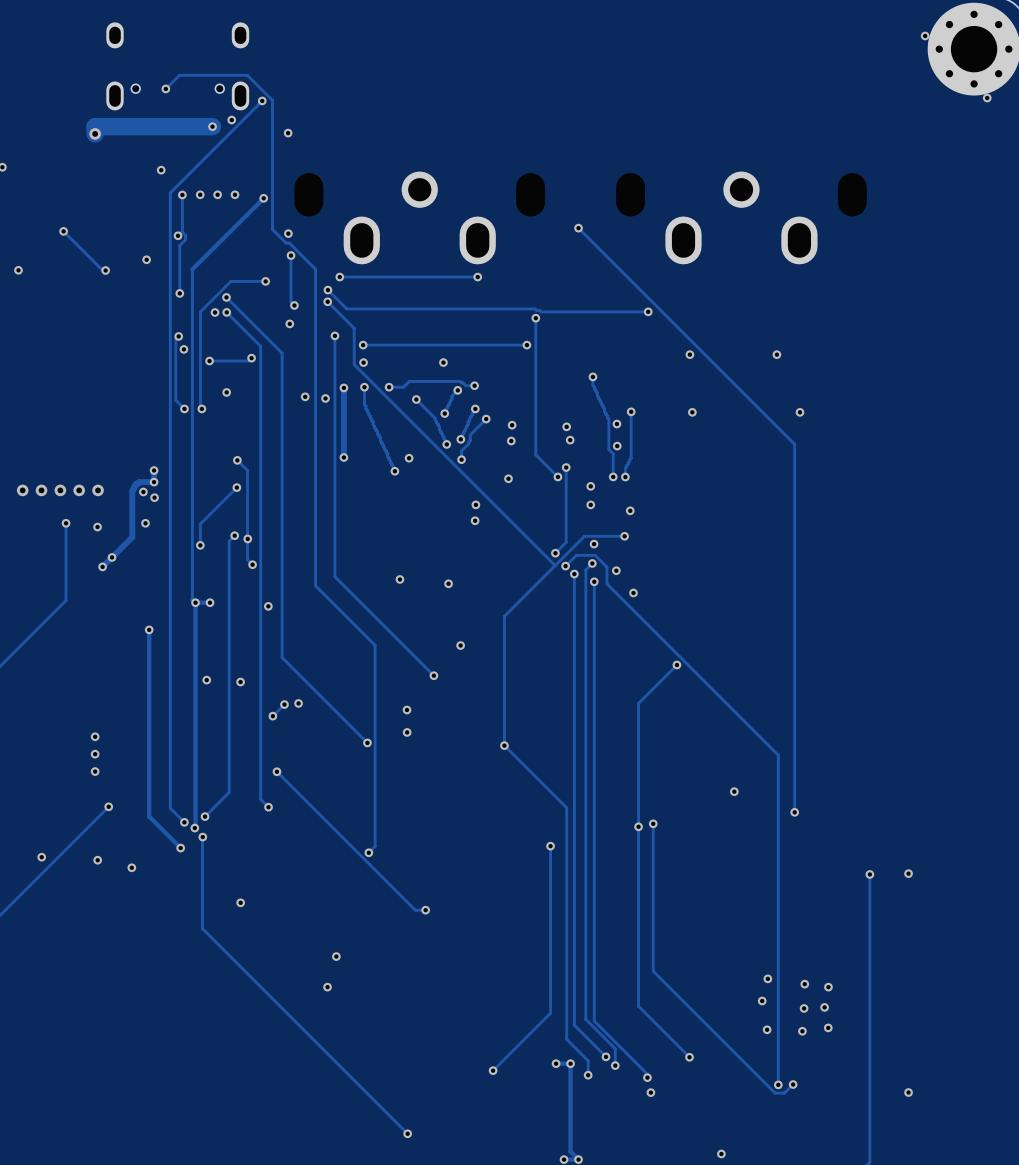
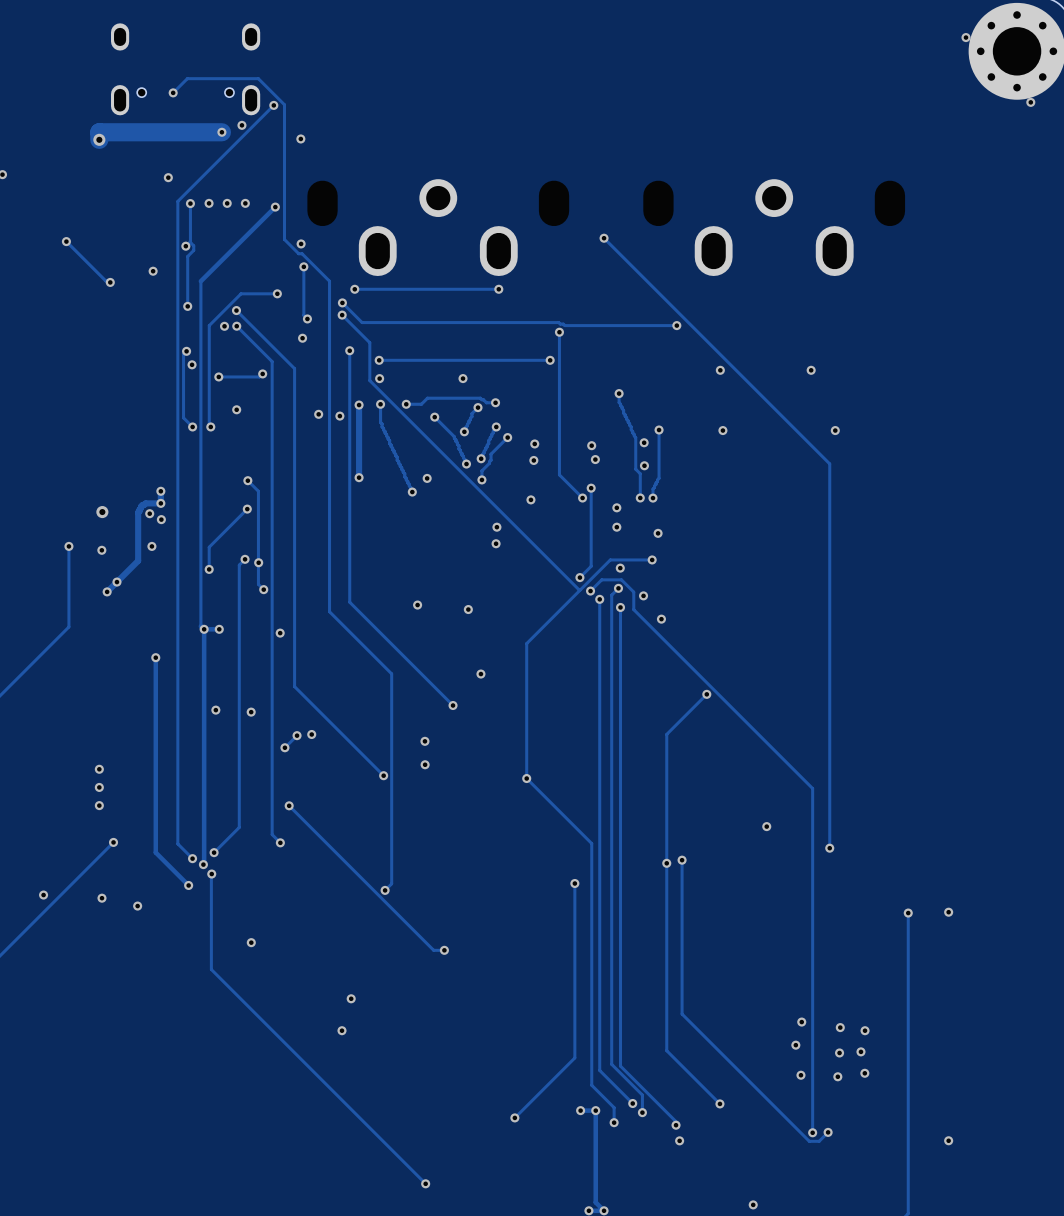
via: (18, 270) -> none
via: (22, 490) -> none
via: (41, 490) -> none
via: (60, 490) -> none
via: (79, 490) -> none

